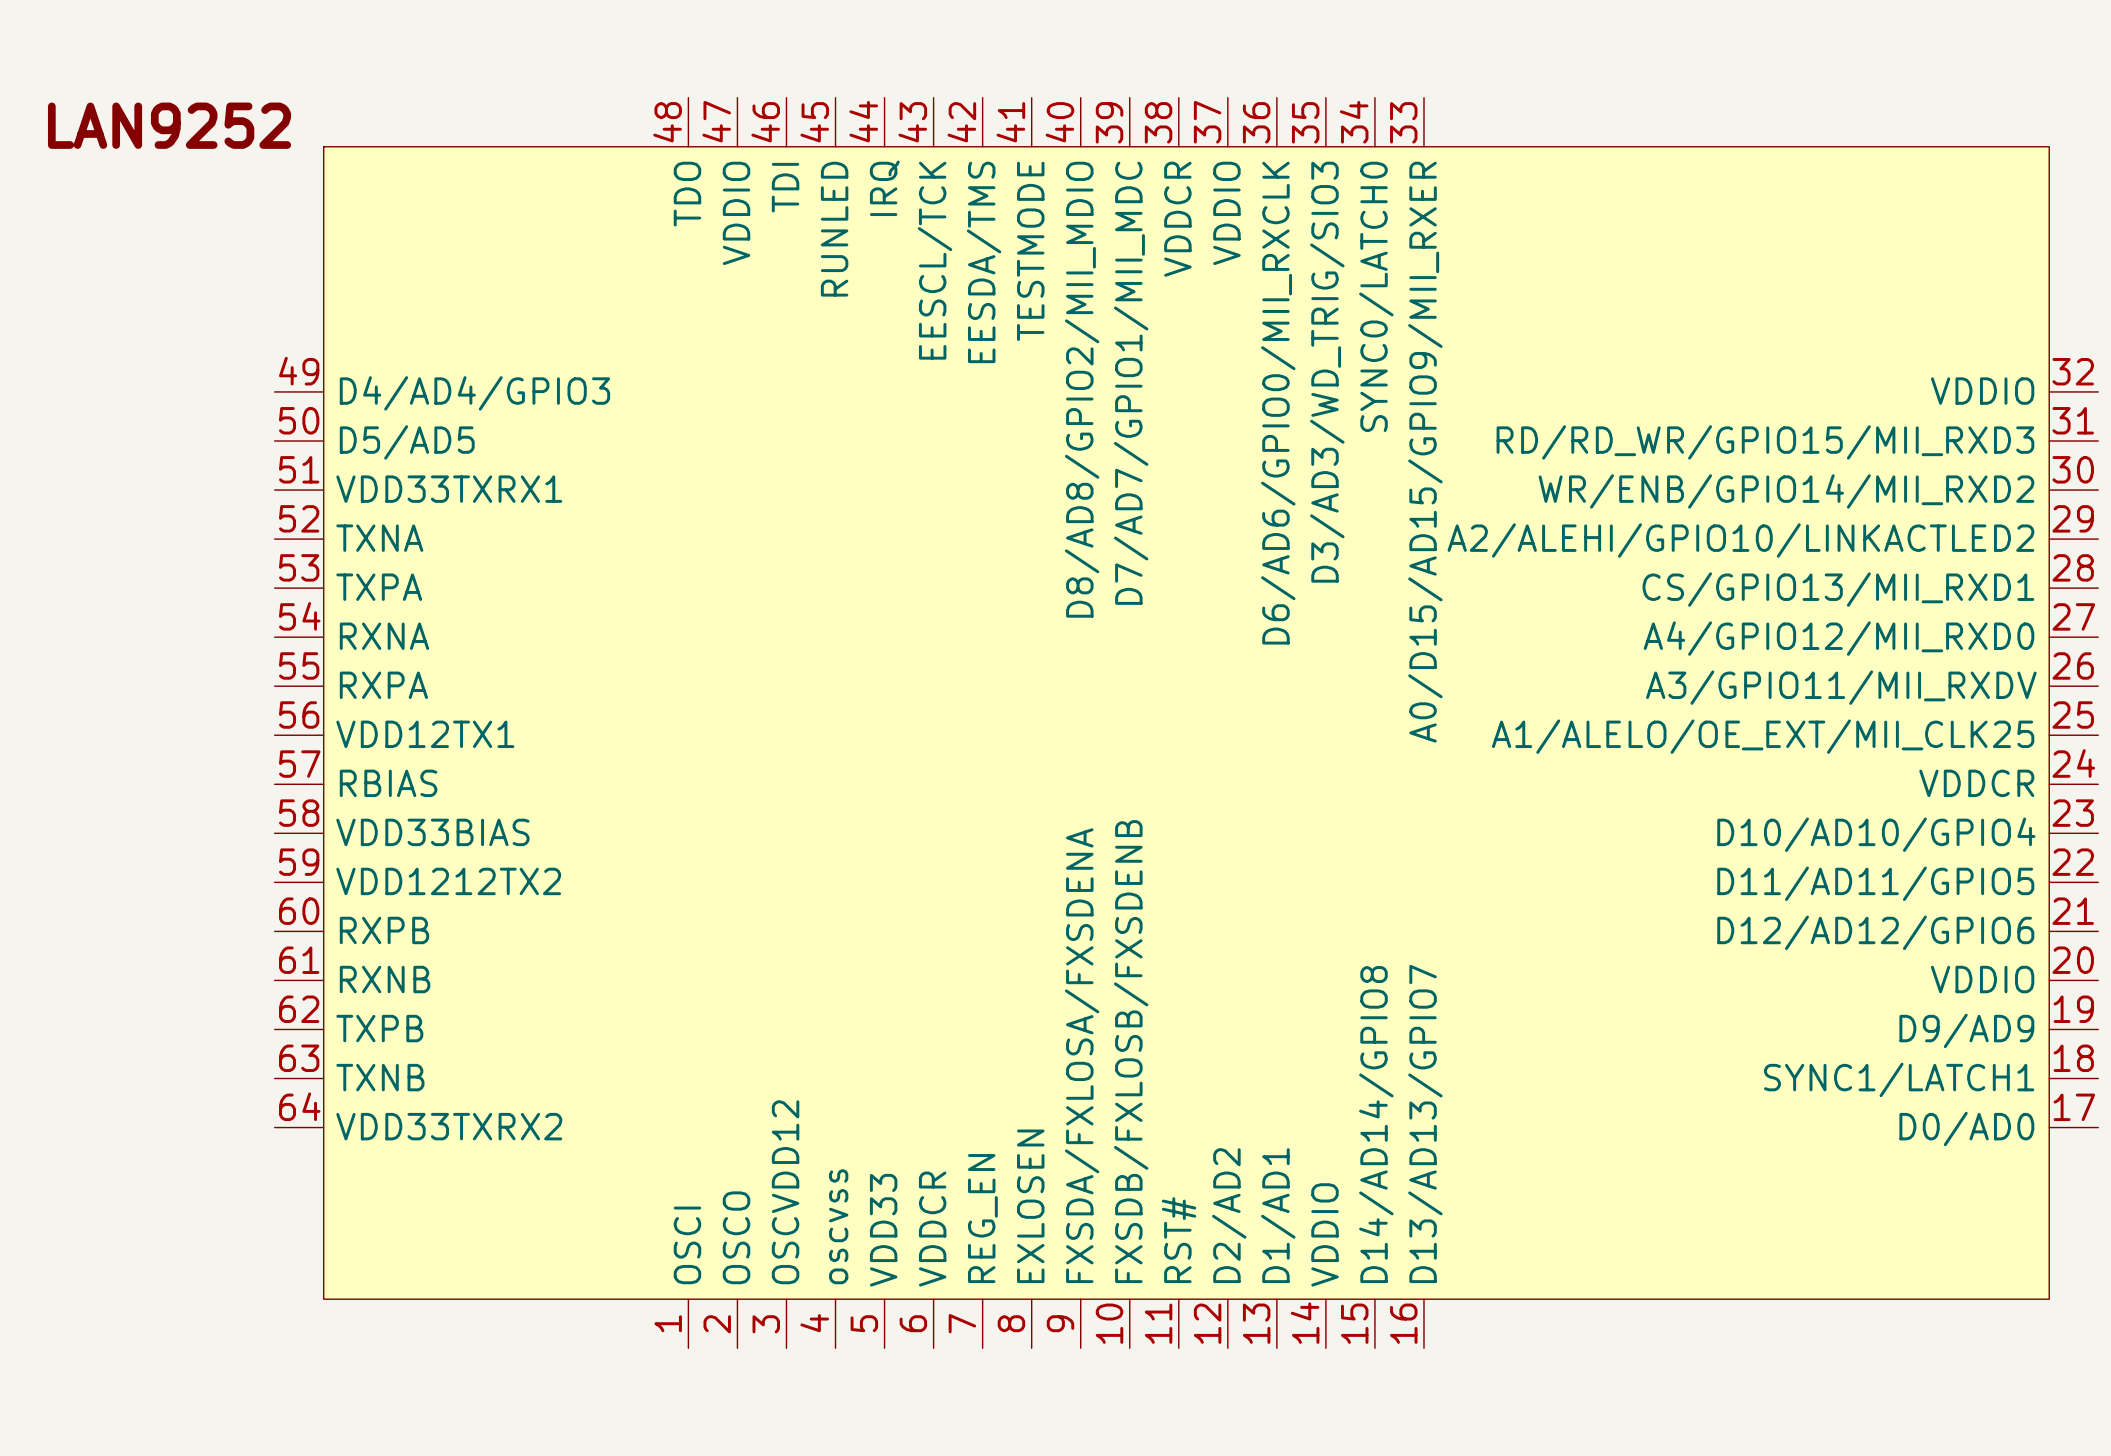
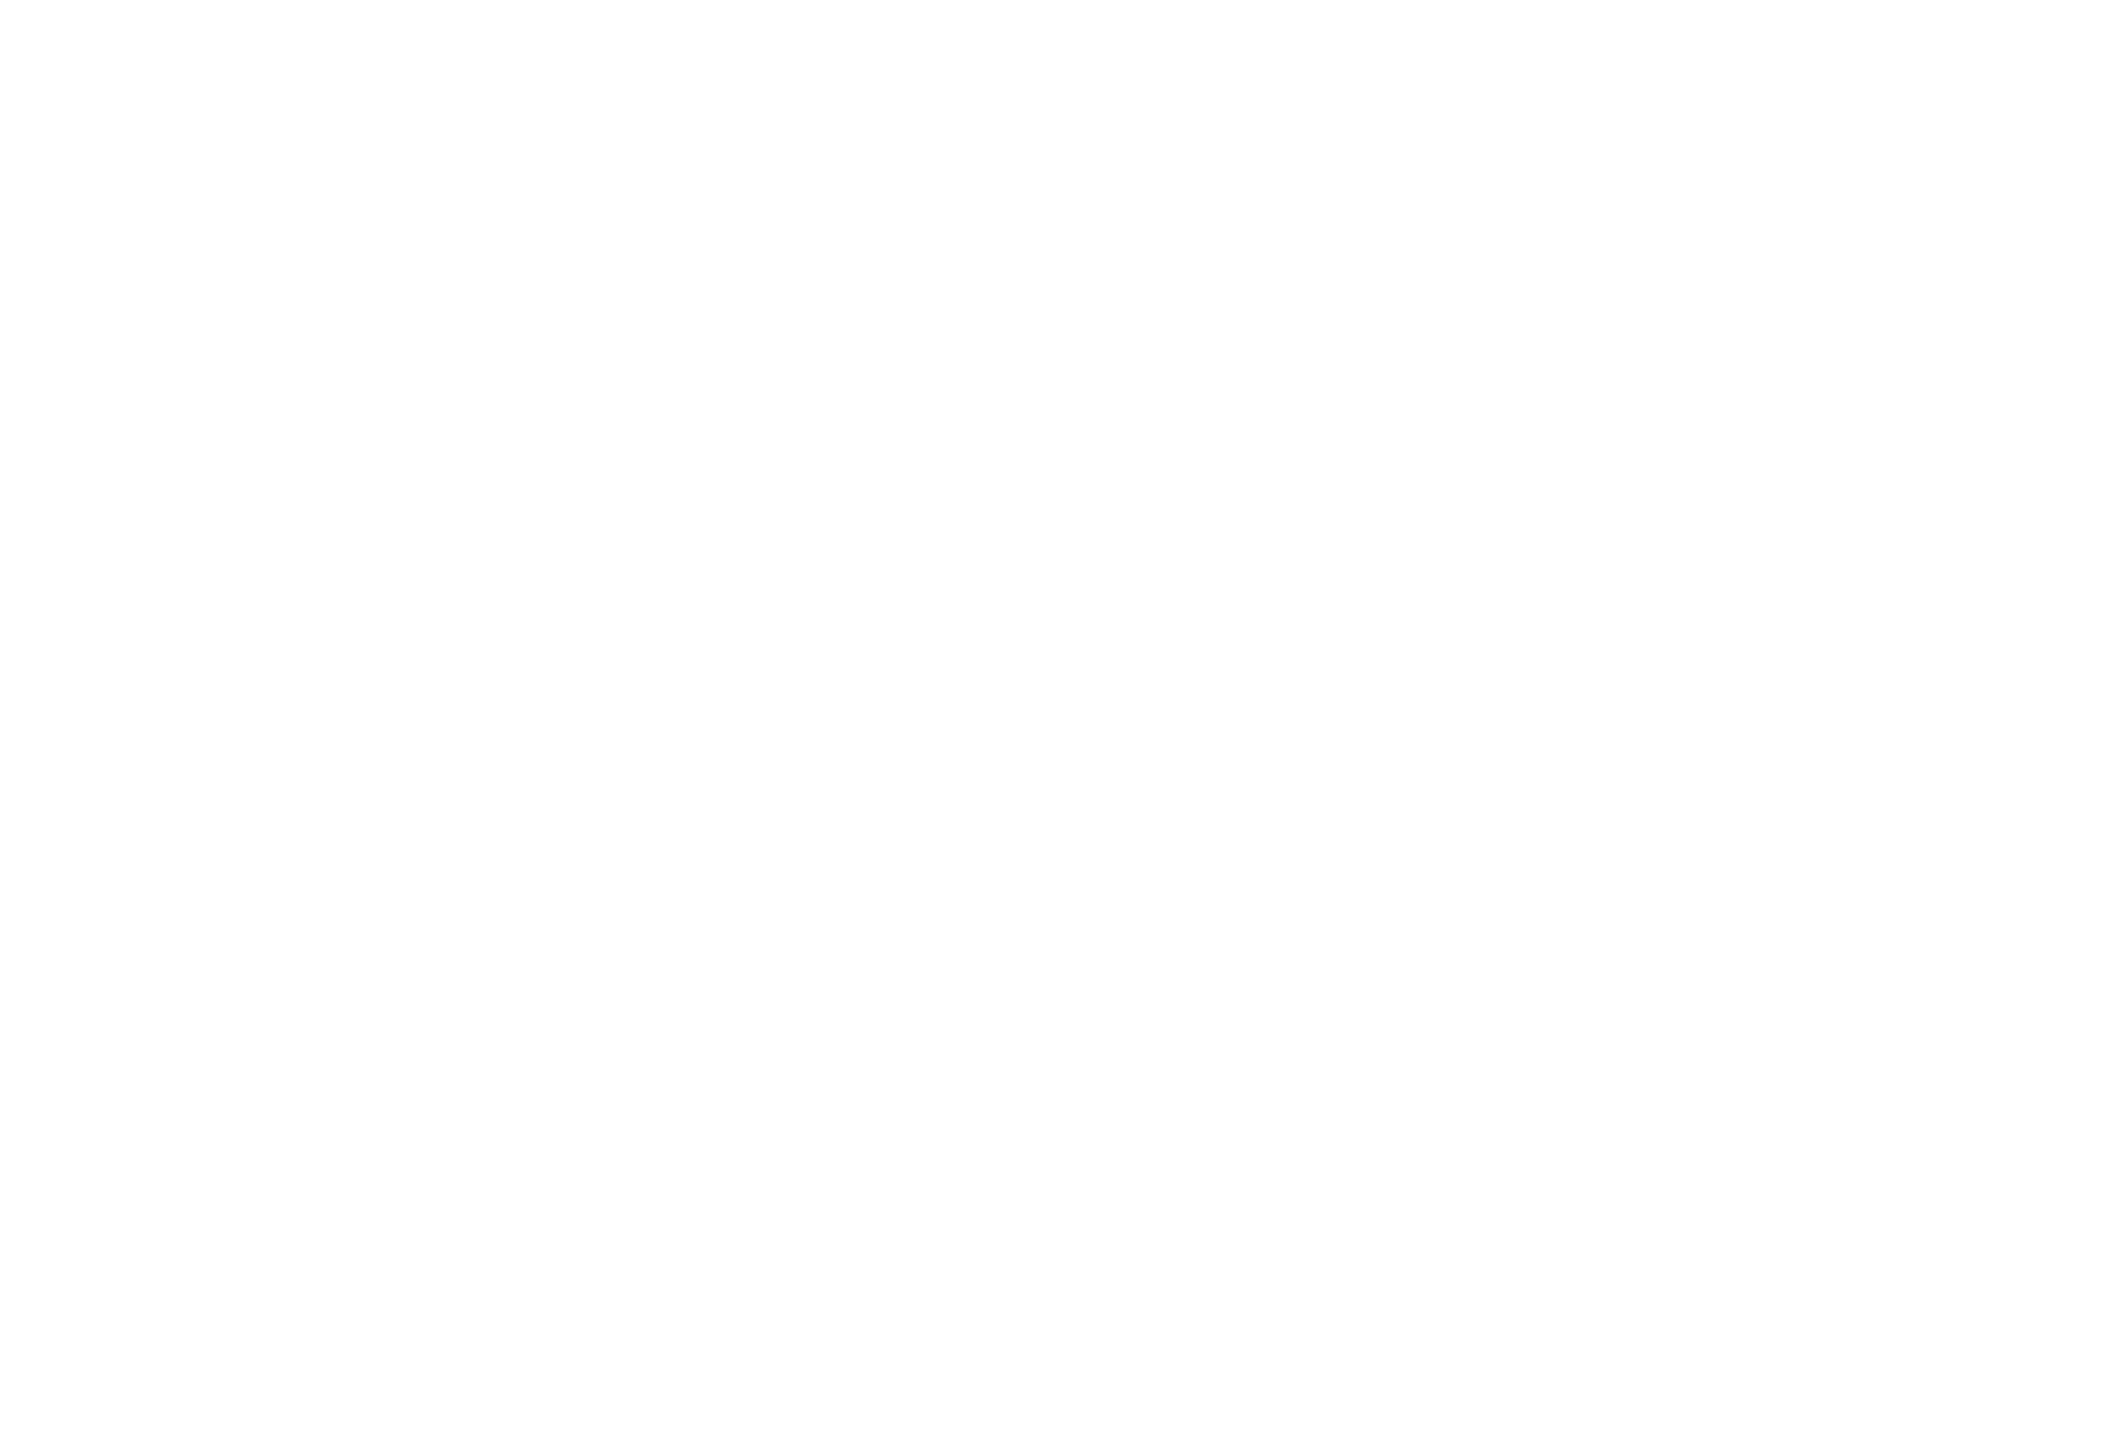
part: (1186, 722) -> none

